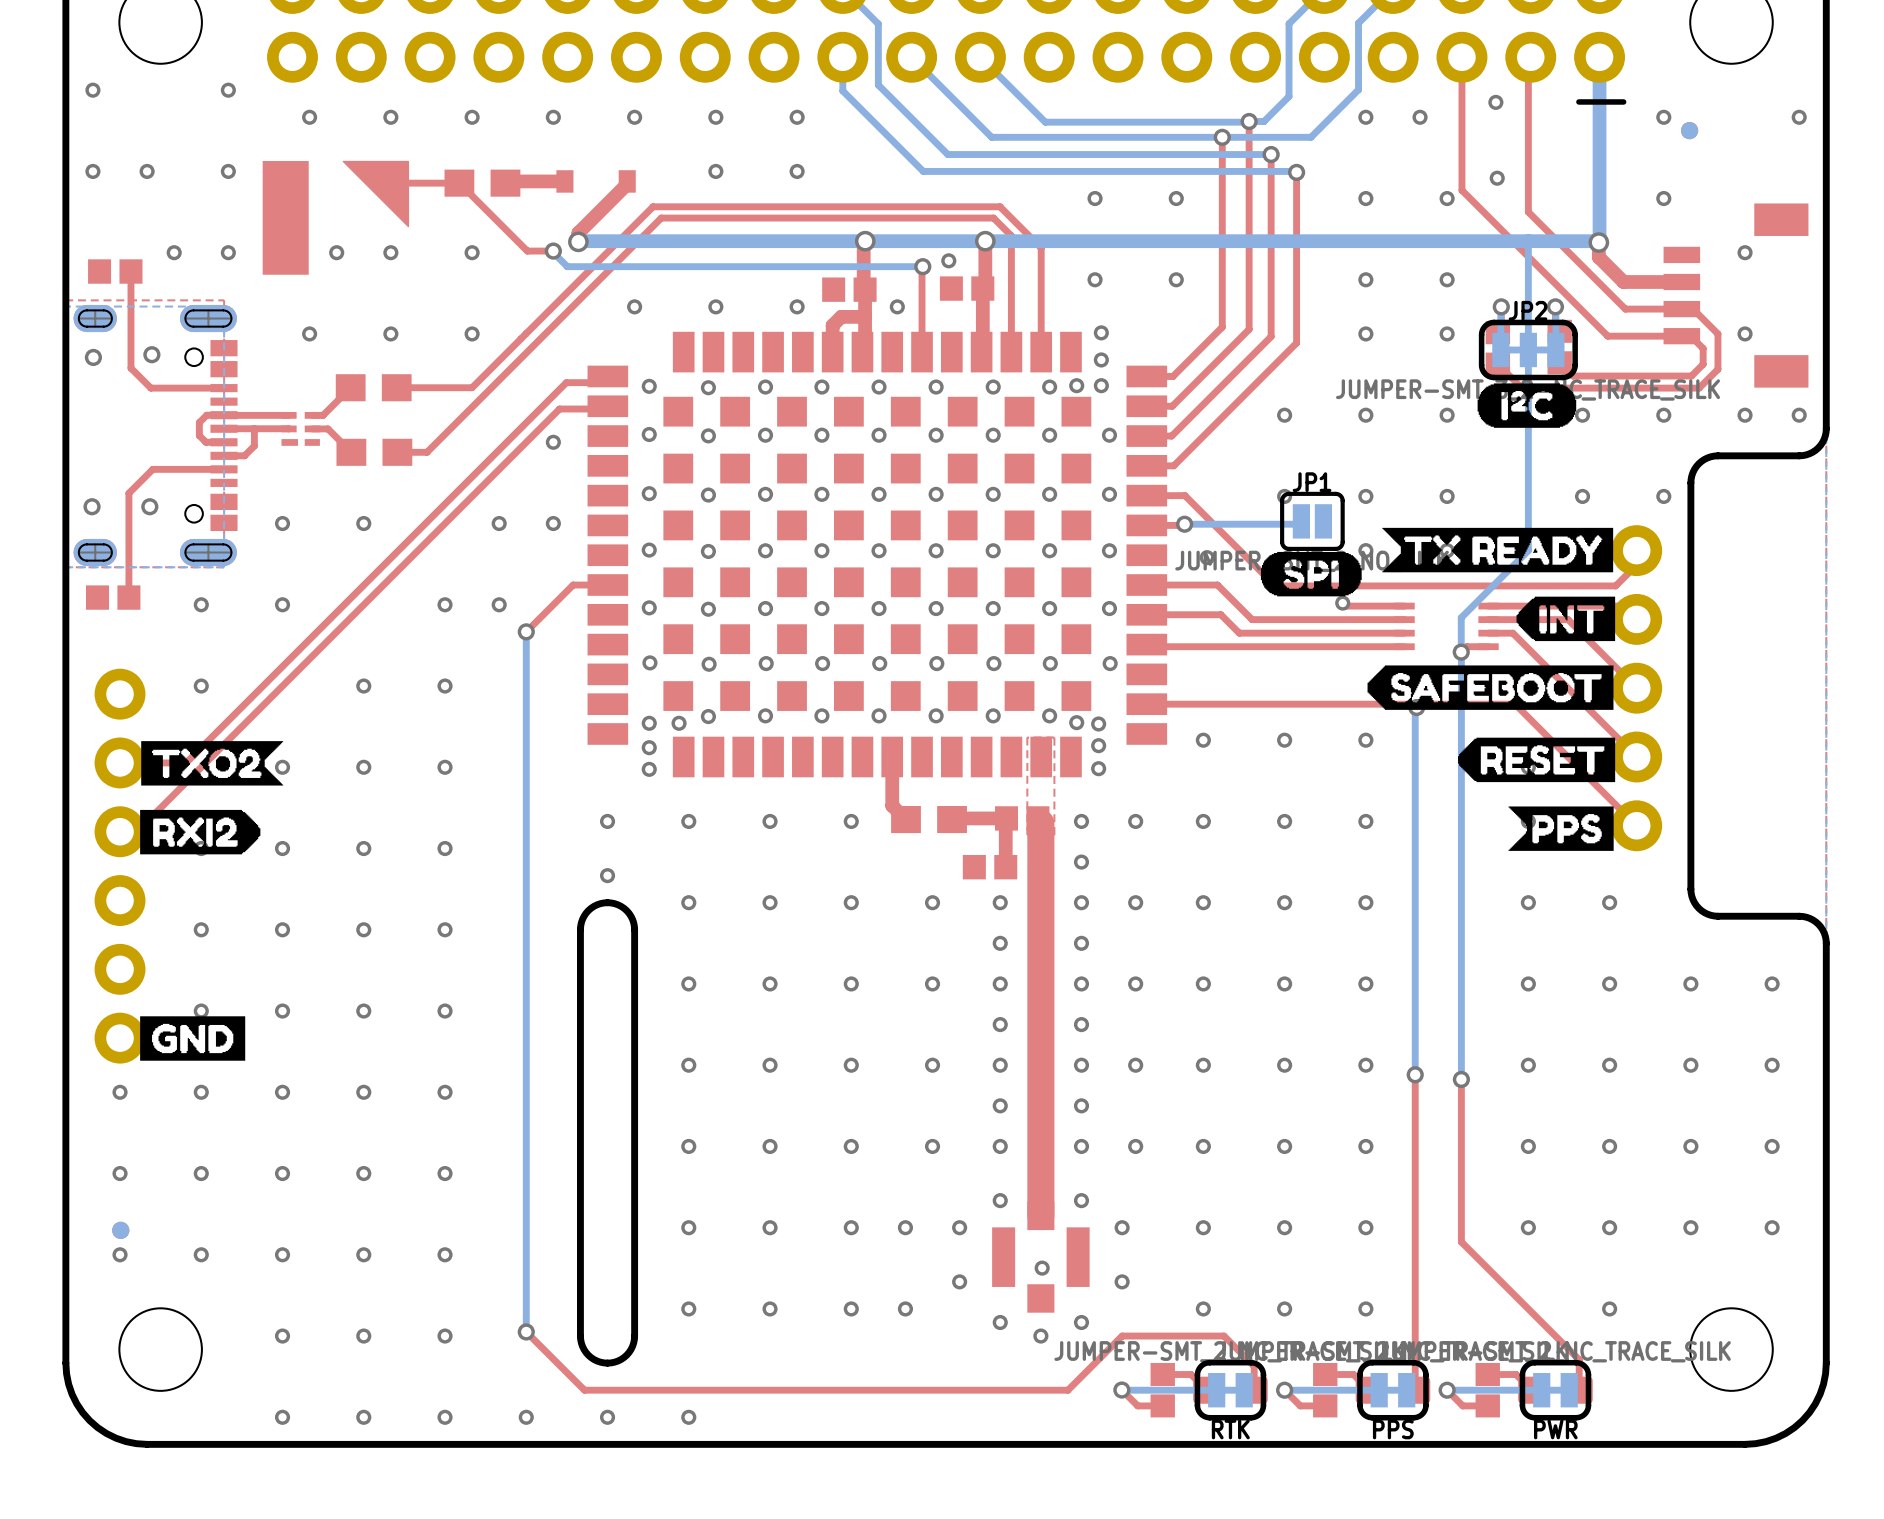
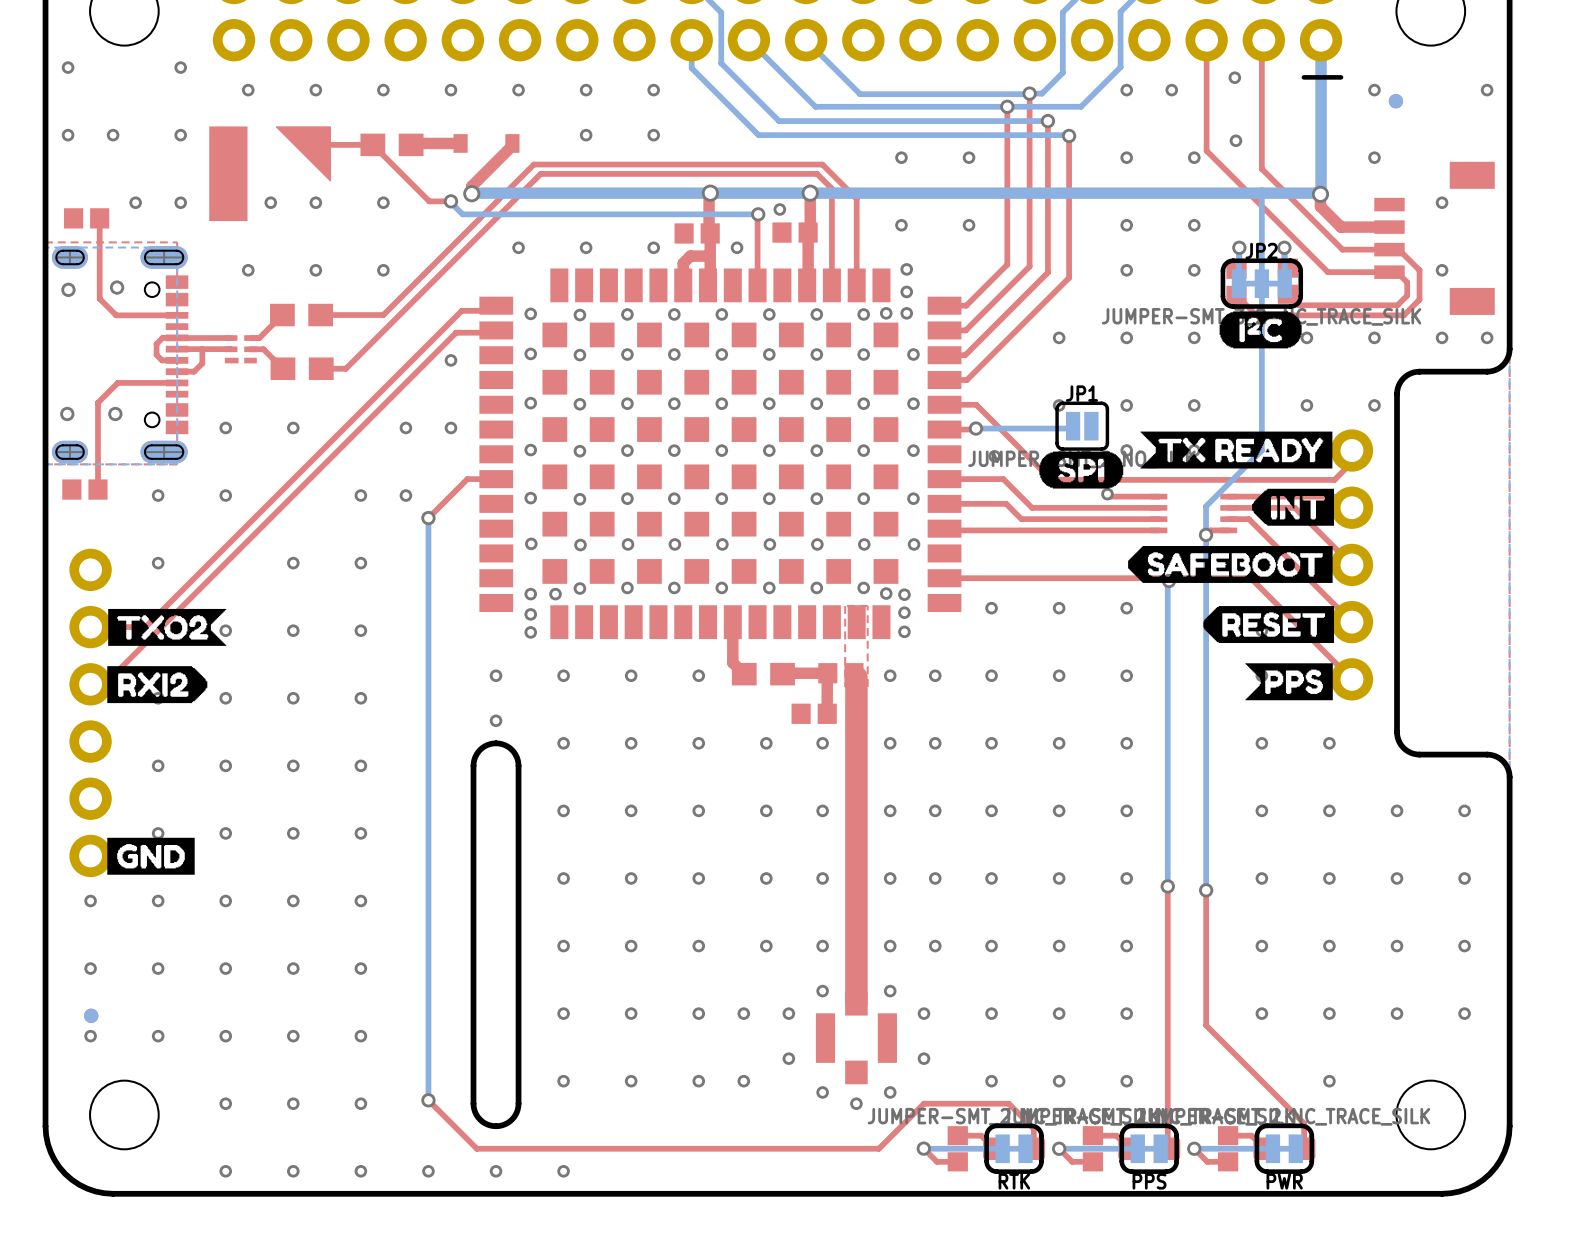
via: (1081, 862) -> none
via: (1000, 943) -> none
via: (1081, 943) -> none
via: (1000, 1024) -> none
via: (1081, 1024) -> none
via: (1000, 1105) -> none
via: (1081, 1105) -> none
via: (1042, 1268) -> none

